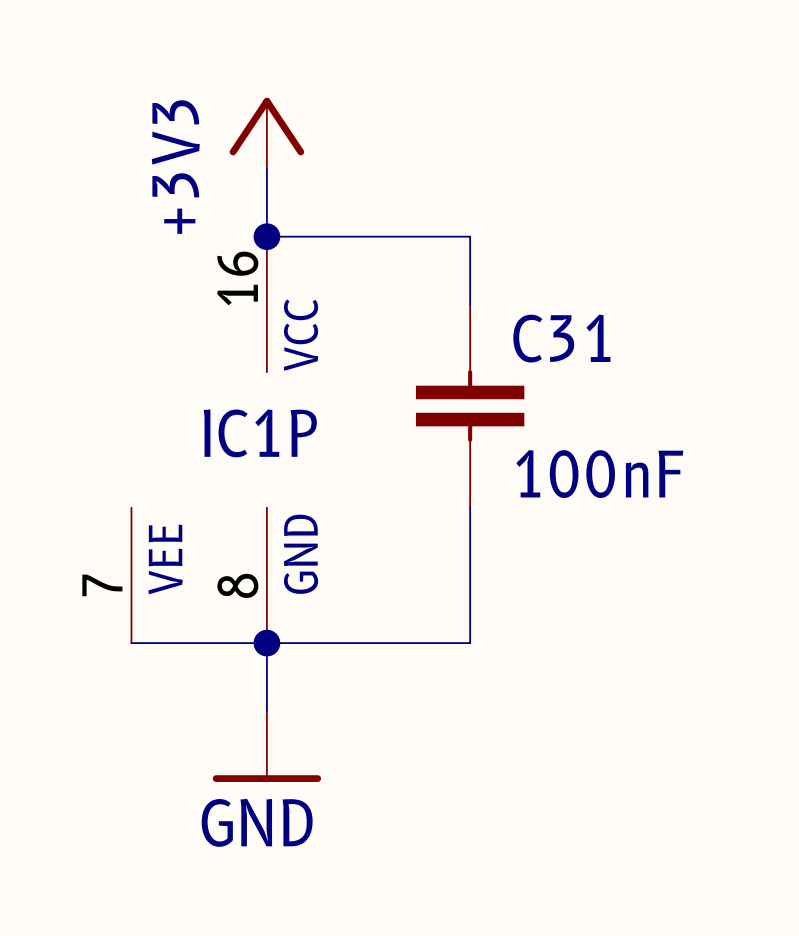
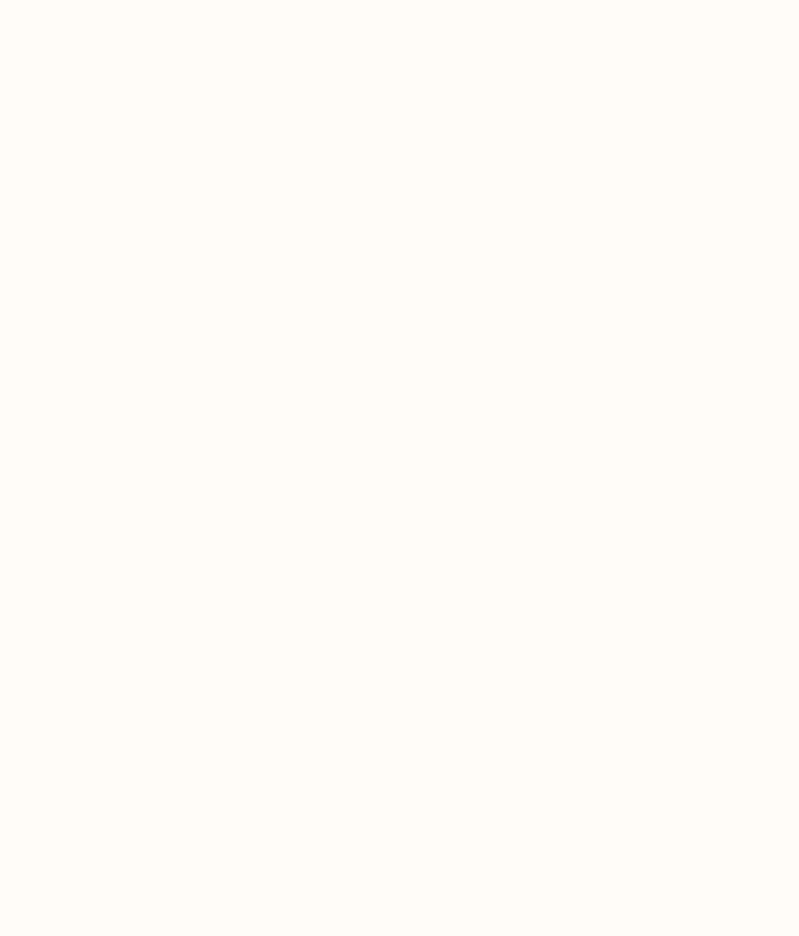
power symbol: +3V3 (266, 133) -> none
wire: (266, 168) (266, 236) (470, 236) (470, 304) -> none
junction: (266, 236) -> none
C31: 100nF (470, 406) -> none
IC1P: (199, 439) -> none
wire: (470, 507) (470, 643) (131, 643) -> none
wire: (266, 643) (266, 710) -> none
junction: (266, 643) -> none
power symbol: GND (266, 746) -> none

